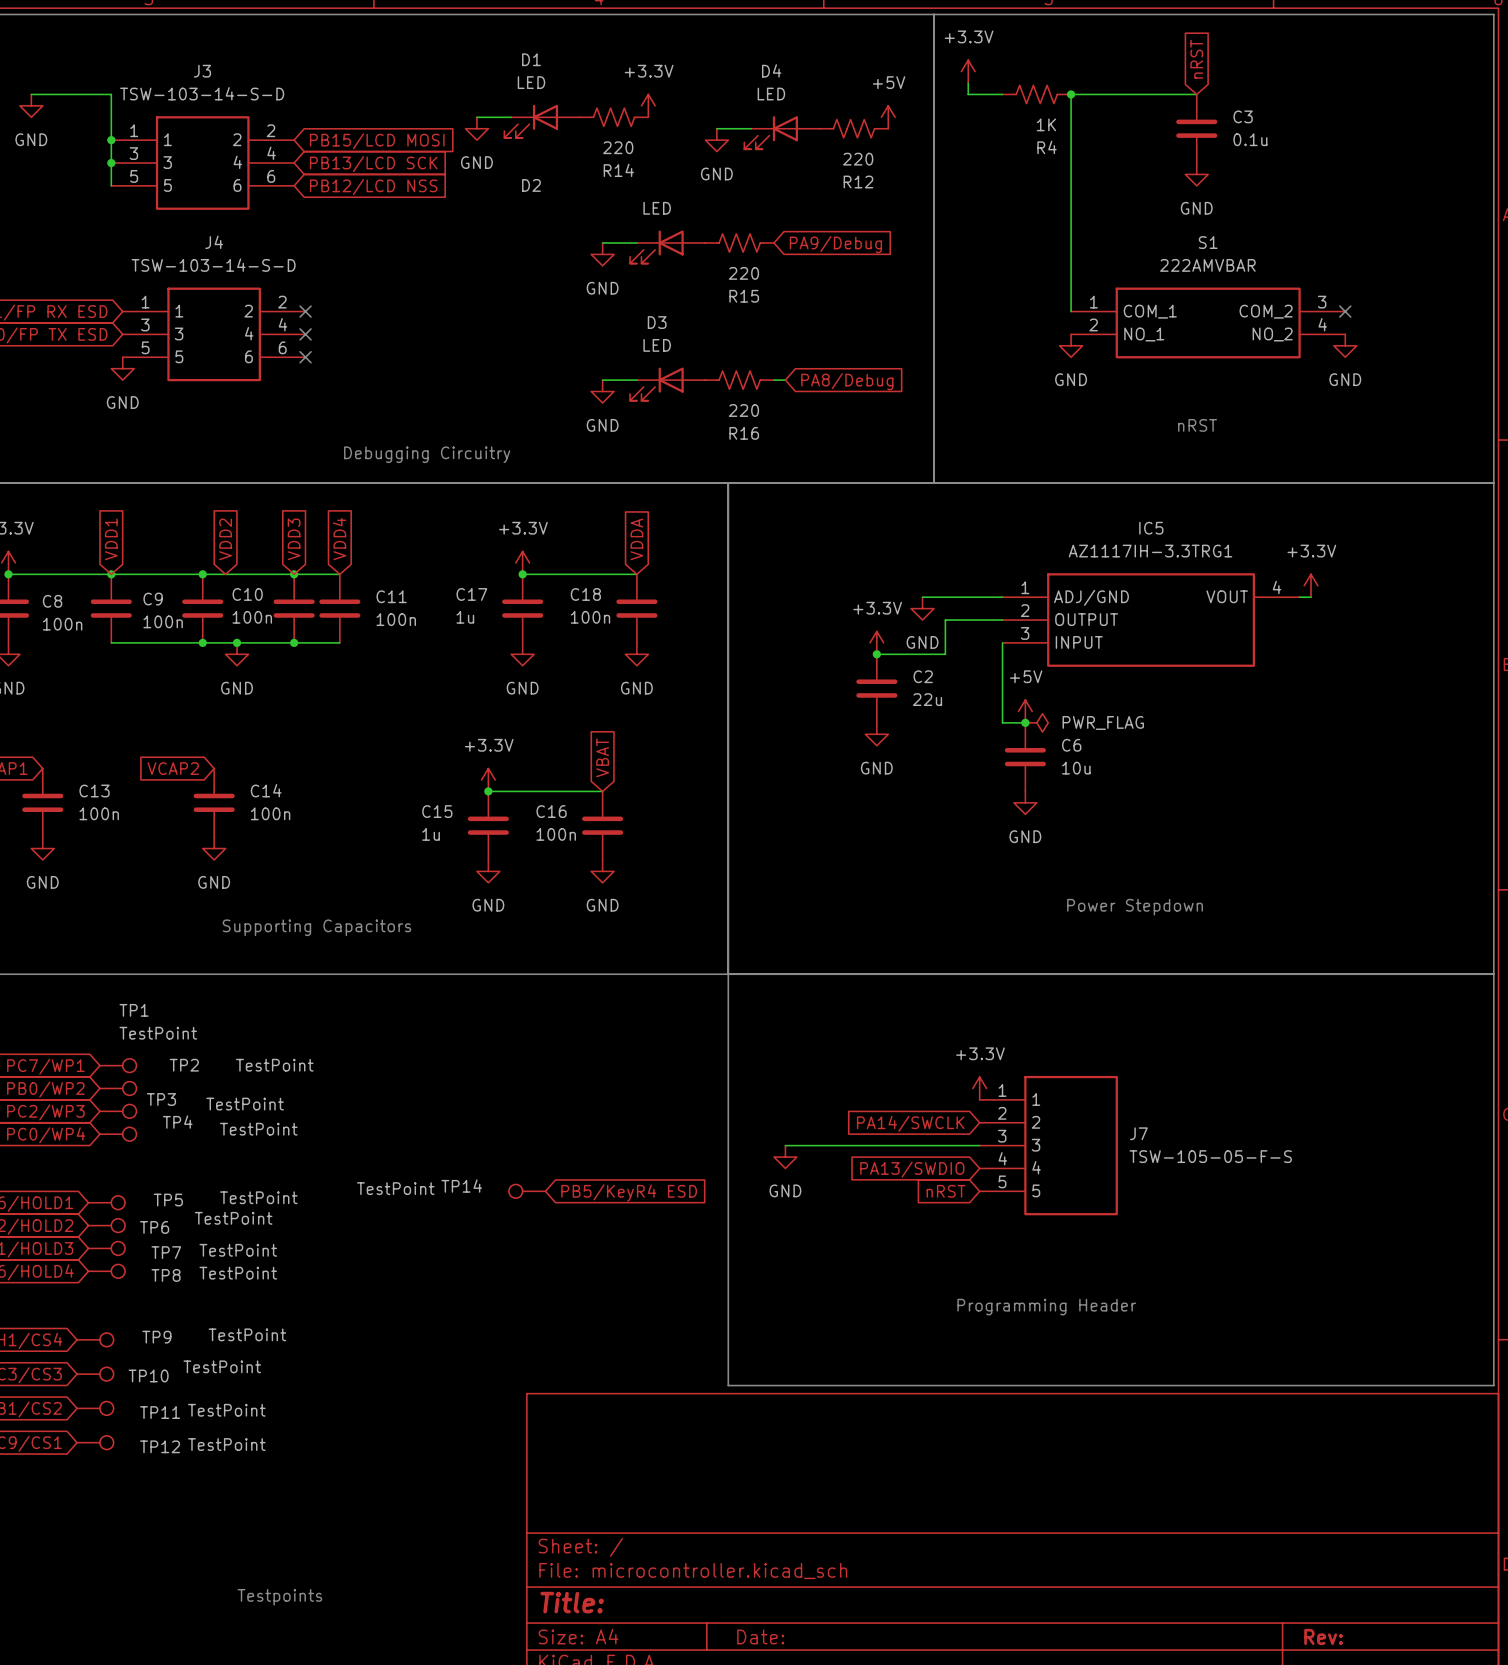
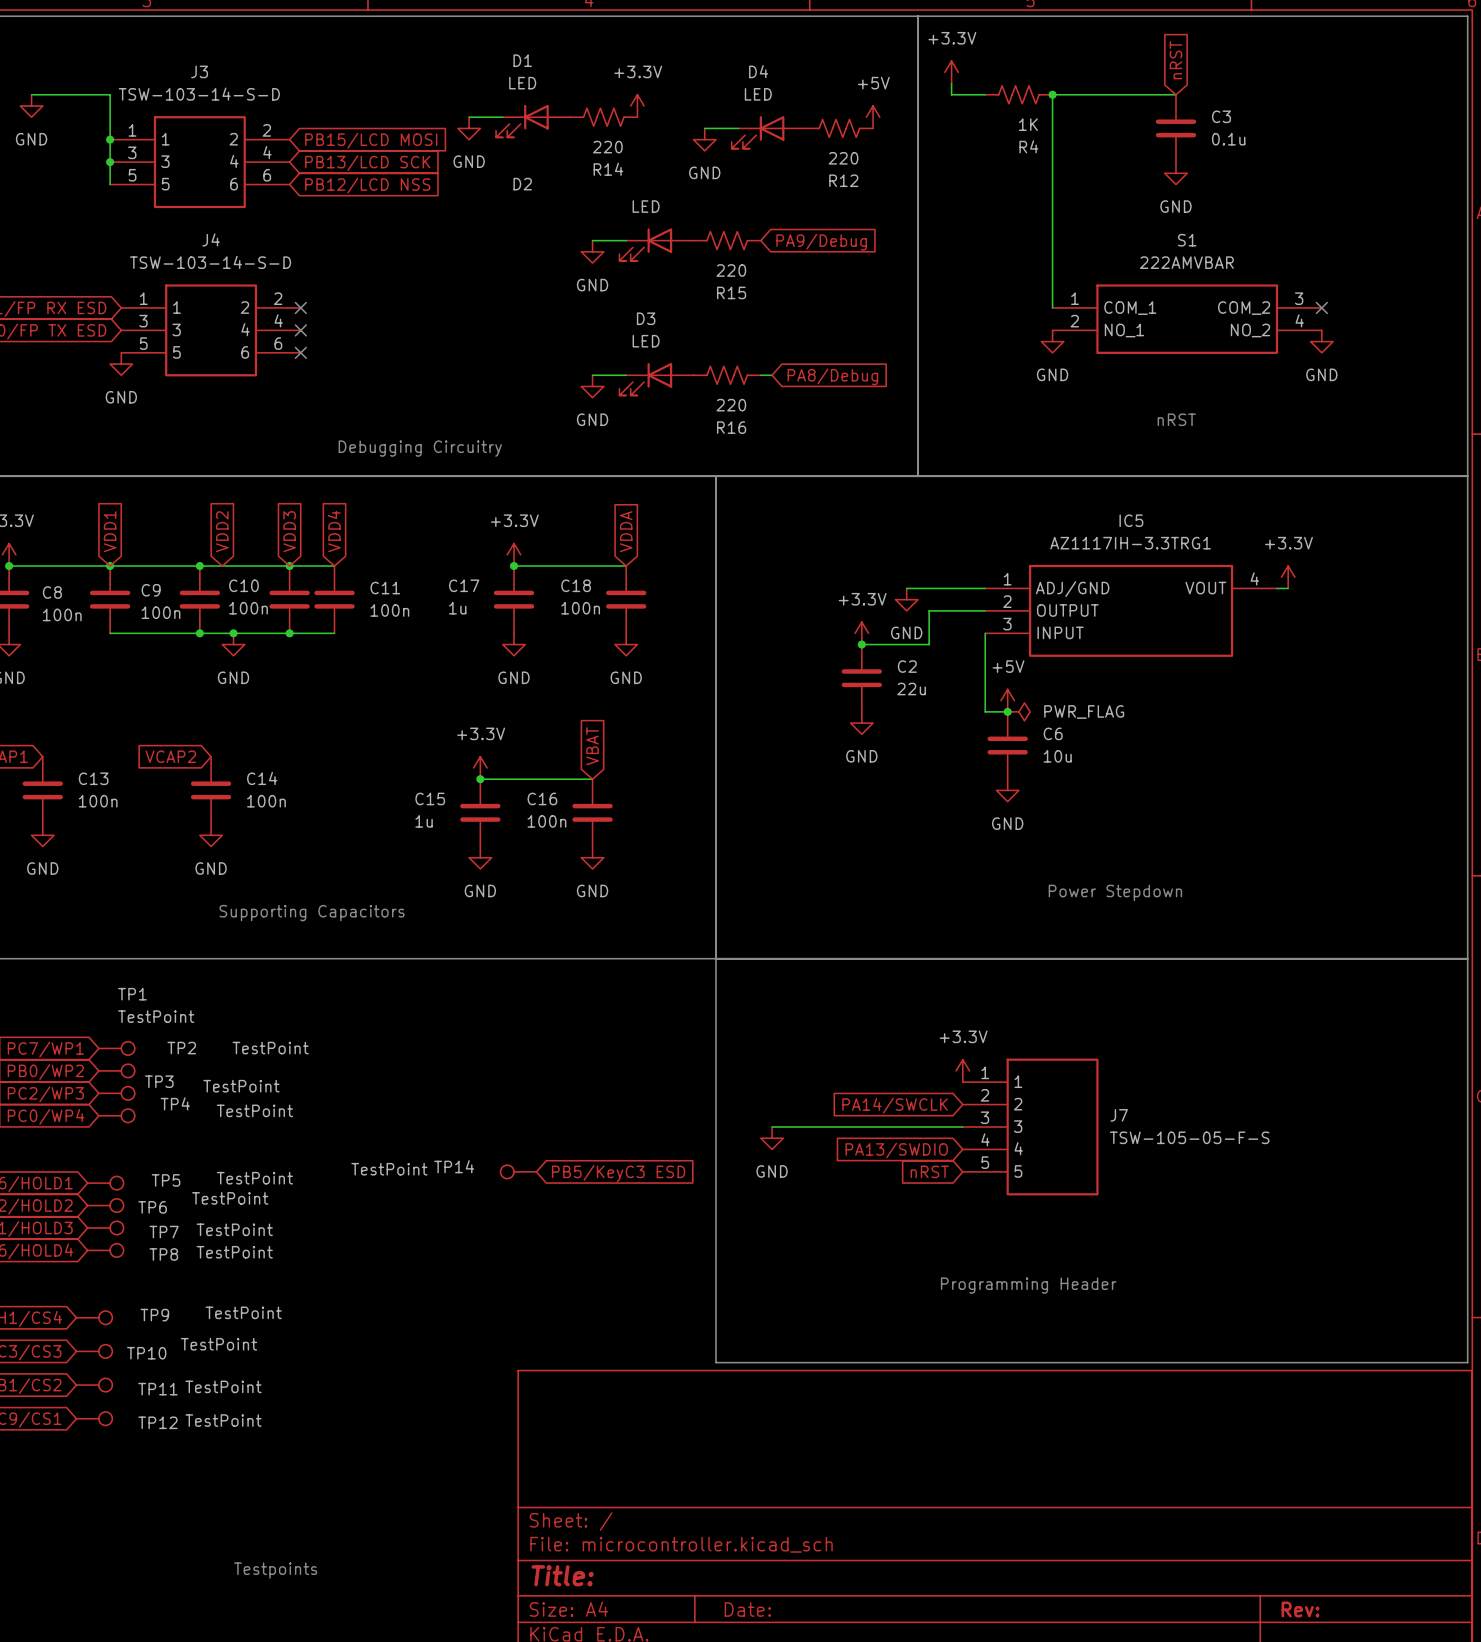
global label: PB5/KeyR4 ESD (629, 1192) -> PB5/KeyC3 ESD (618, 1173)

